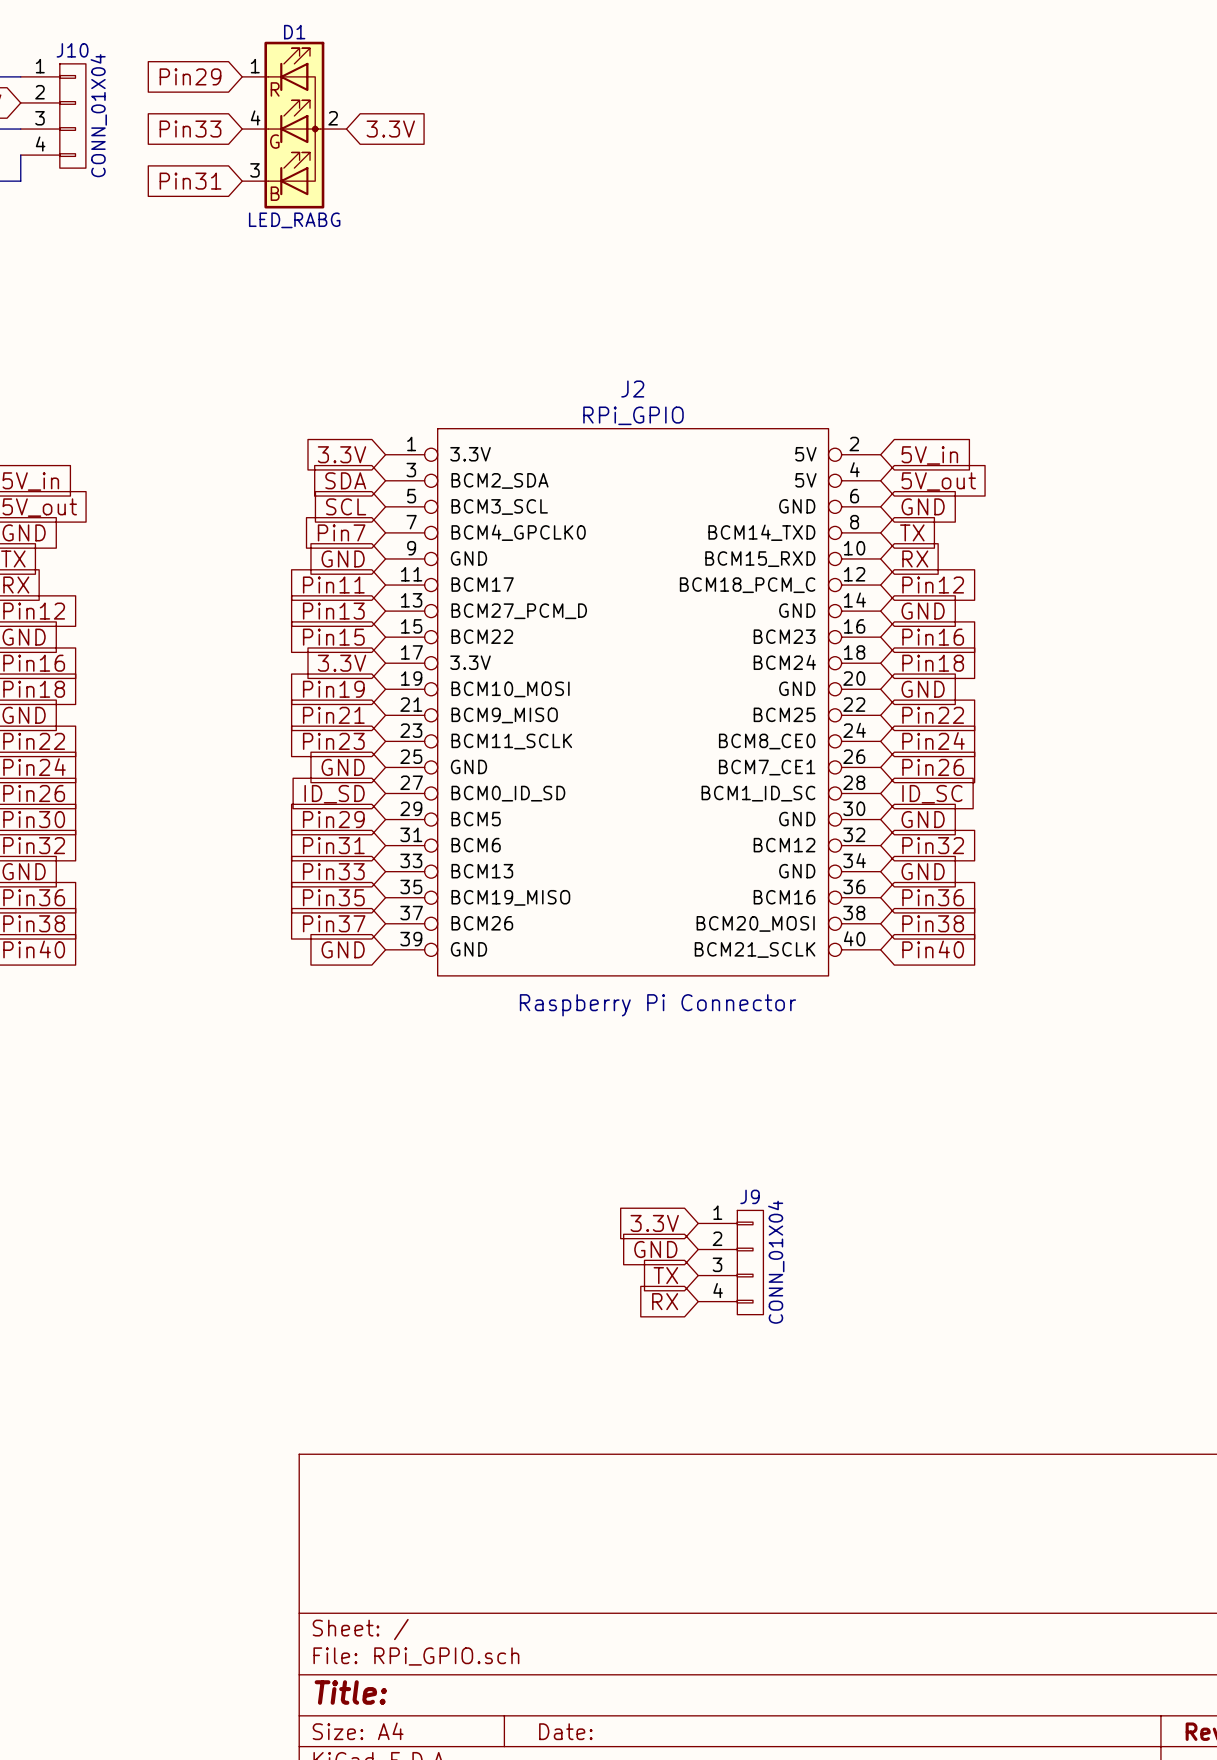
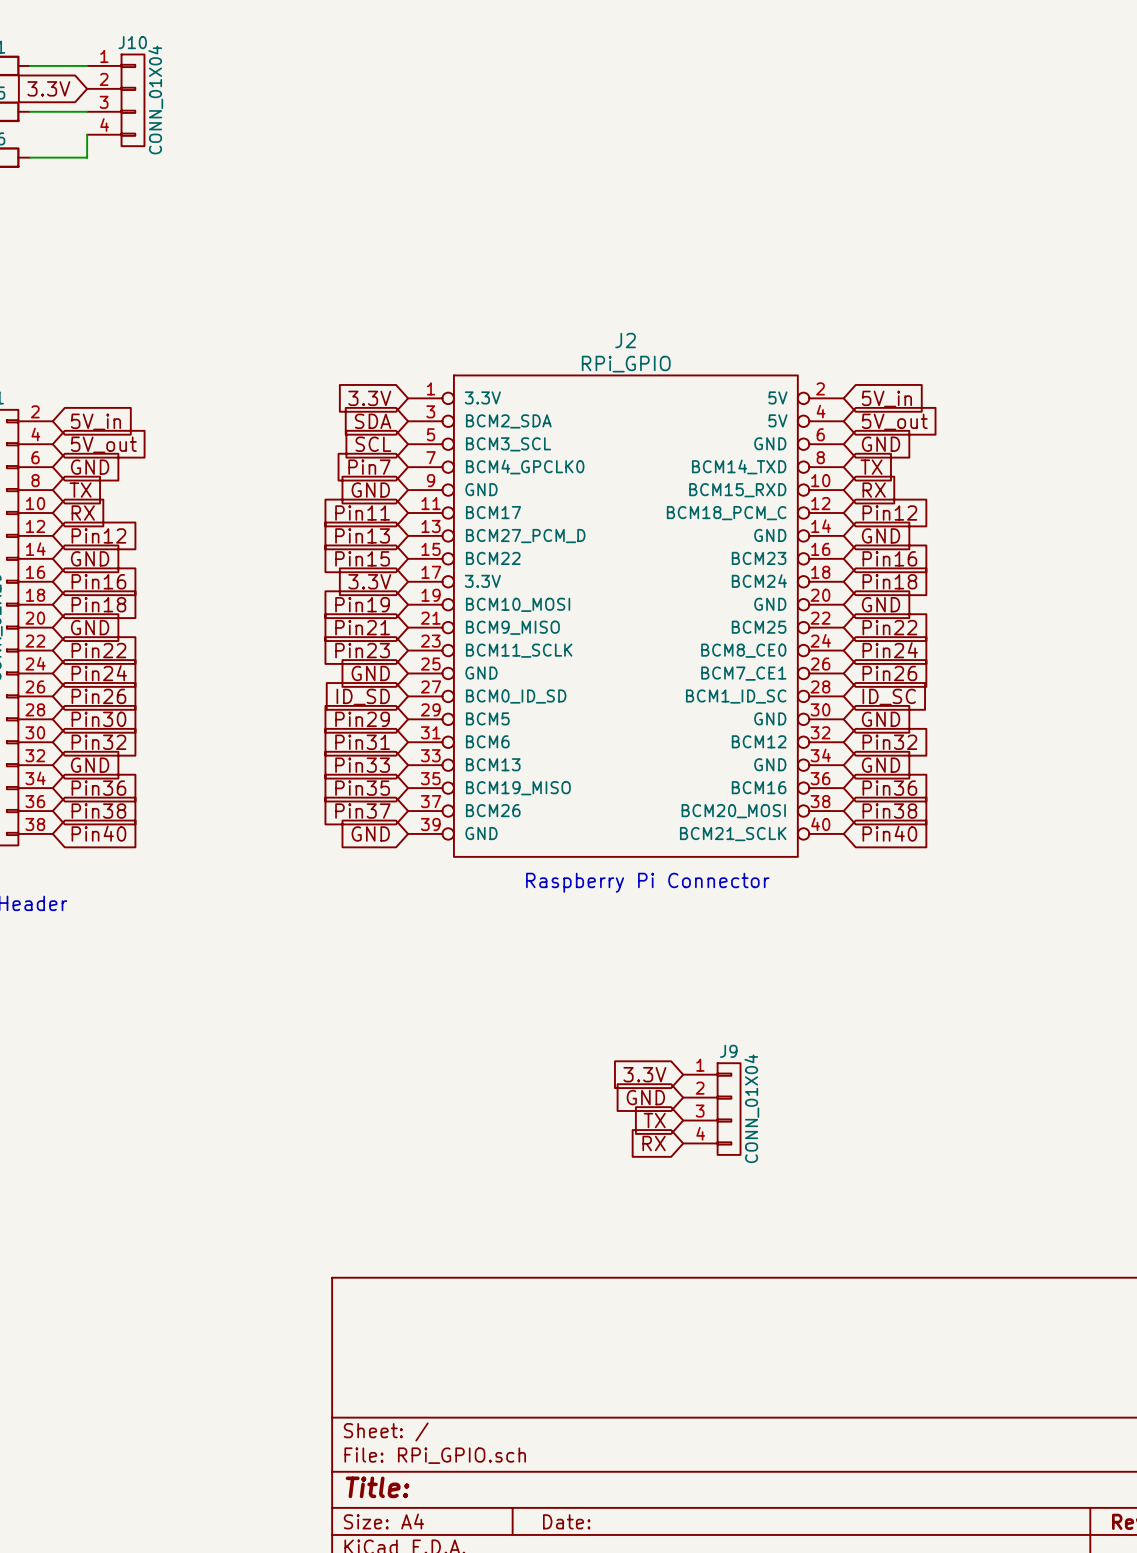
global label: Pin29 (190, 76) -> none
D1: LED_RABG (294, 125) -> none
global label: Pin33 (190, 129) -> none
global label: 3.3V (390, 129) -> none
global label: Pin31 (190, 181) -> none

